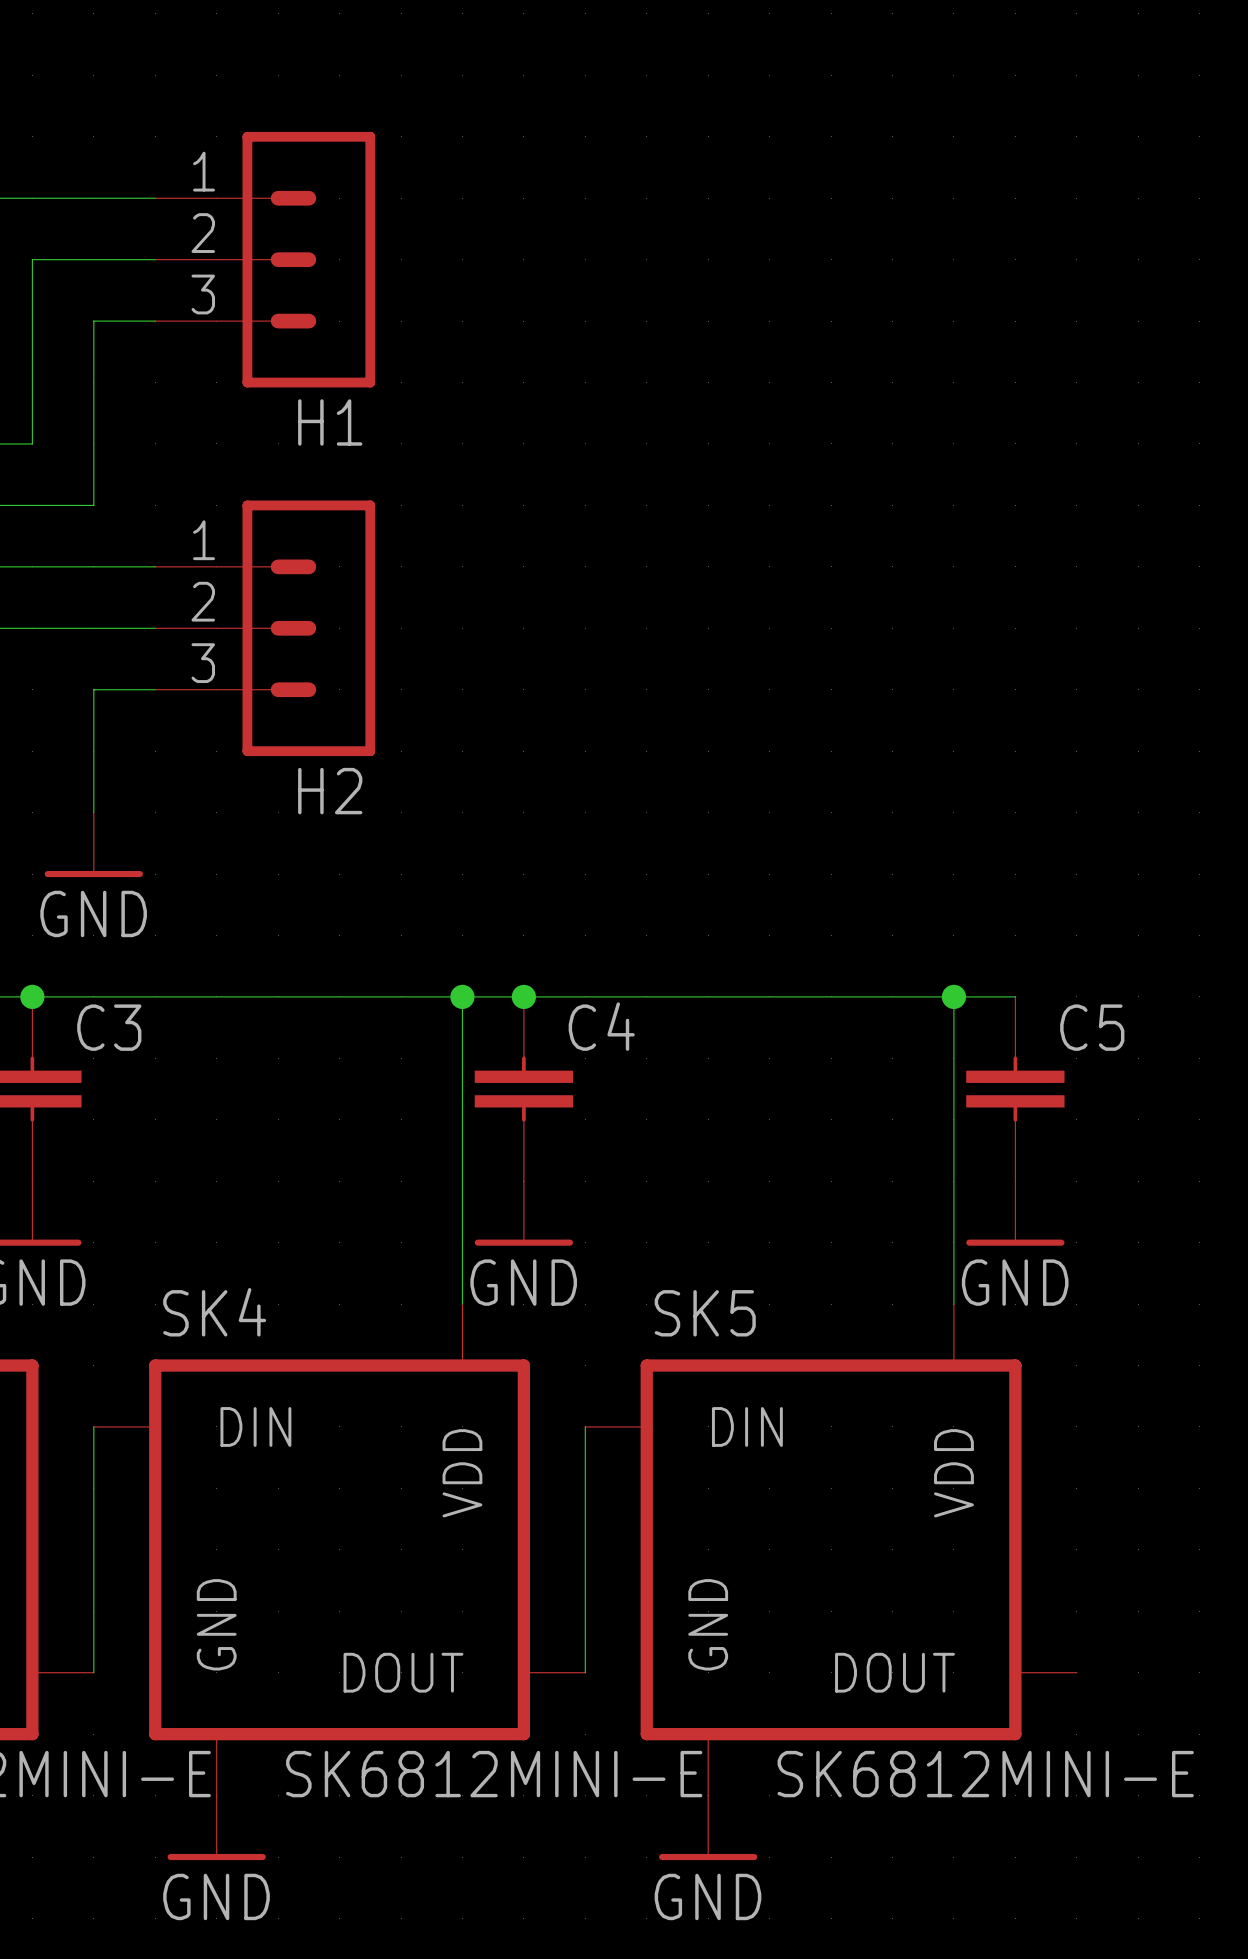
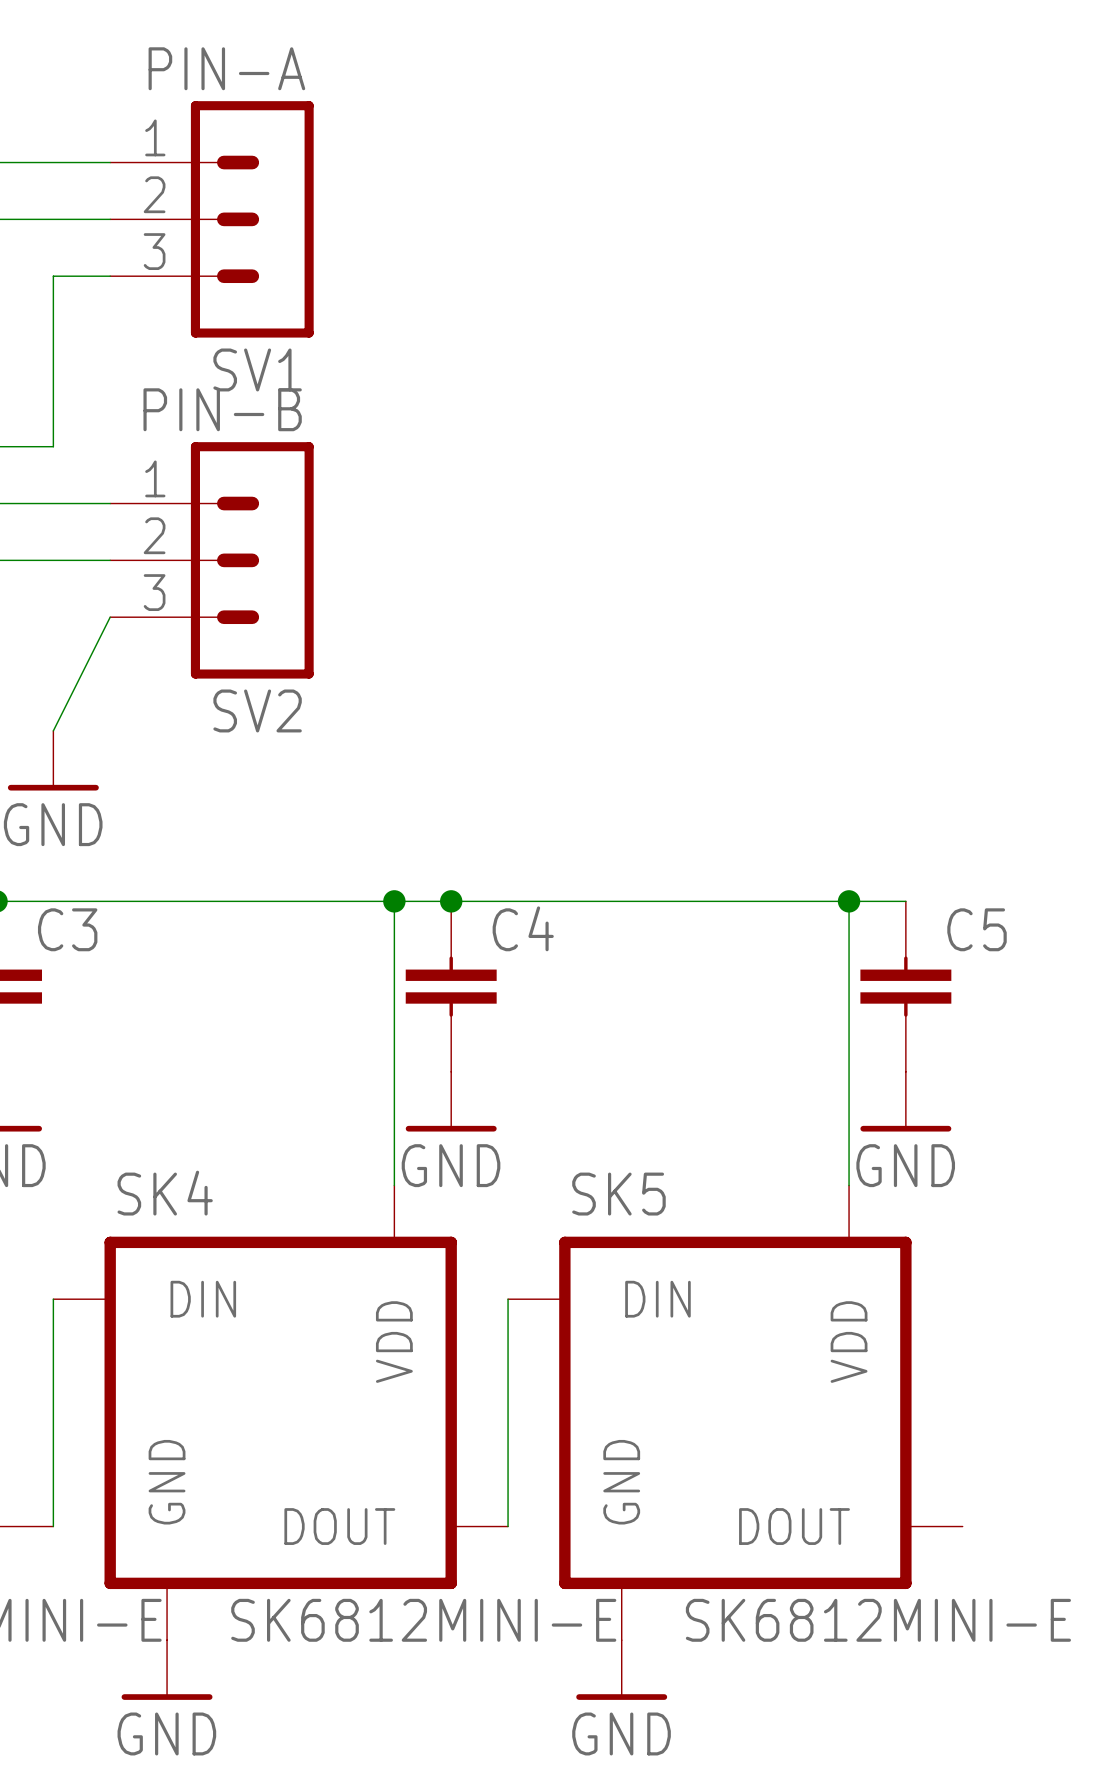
H1 value: none -> PIN-A (226, 68)
H1 name: H1 (330, 422) -> SV1 (257, 369)
H2 value: none -> PIN-B (222, 409)
wire: (155, 689) (93, 689) (93, 812) -> (110, 617) (53, 730)
H2 name: H2 (330, 791) -> SV2 (257, 710)

